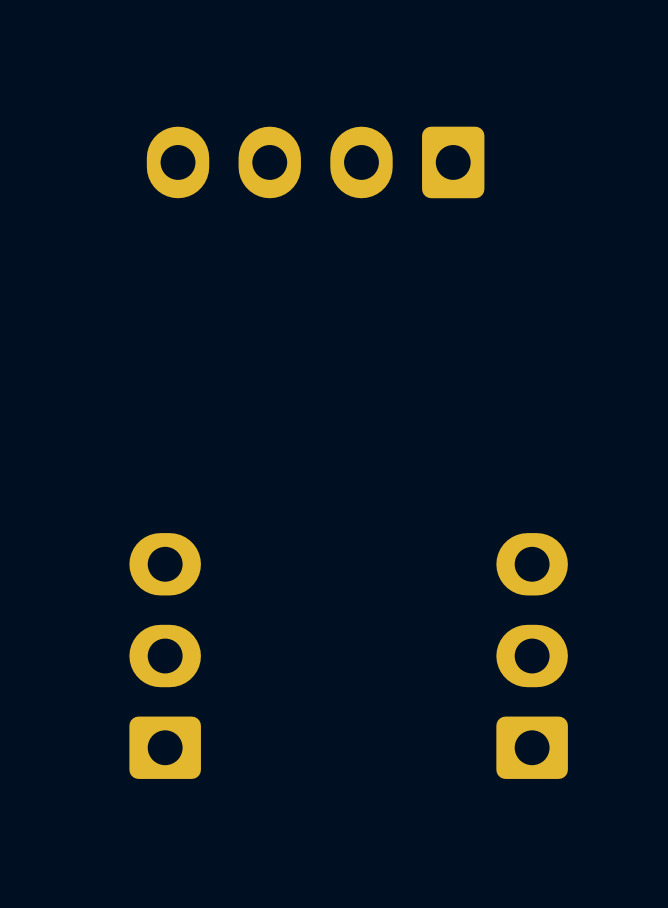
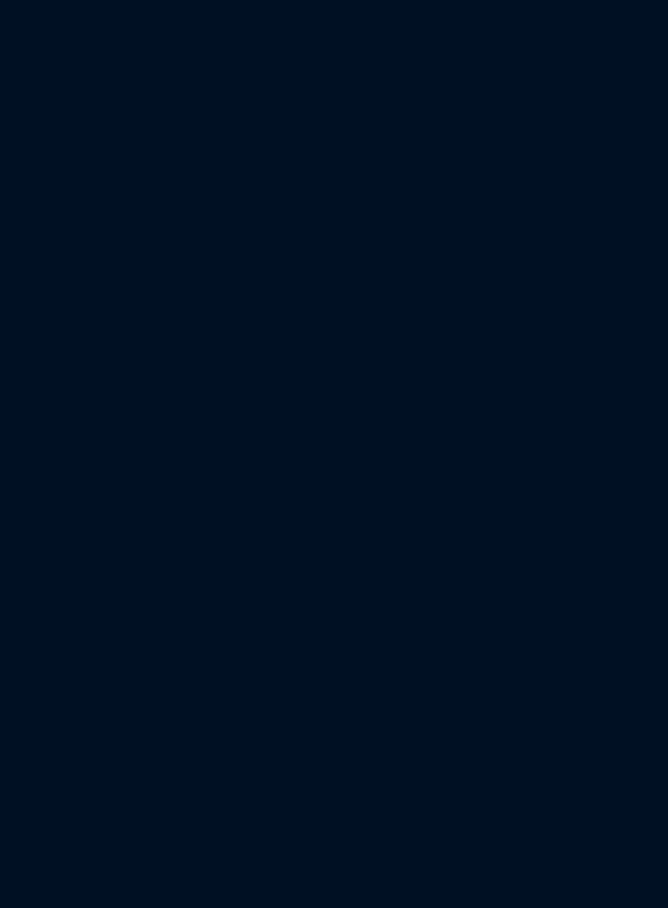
part: (315, 162) -> none
part: (165, 656) -> none
part: (532, 656) -> none

